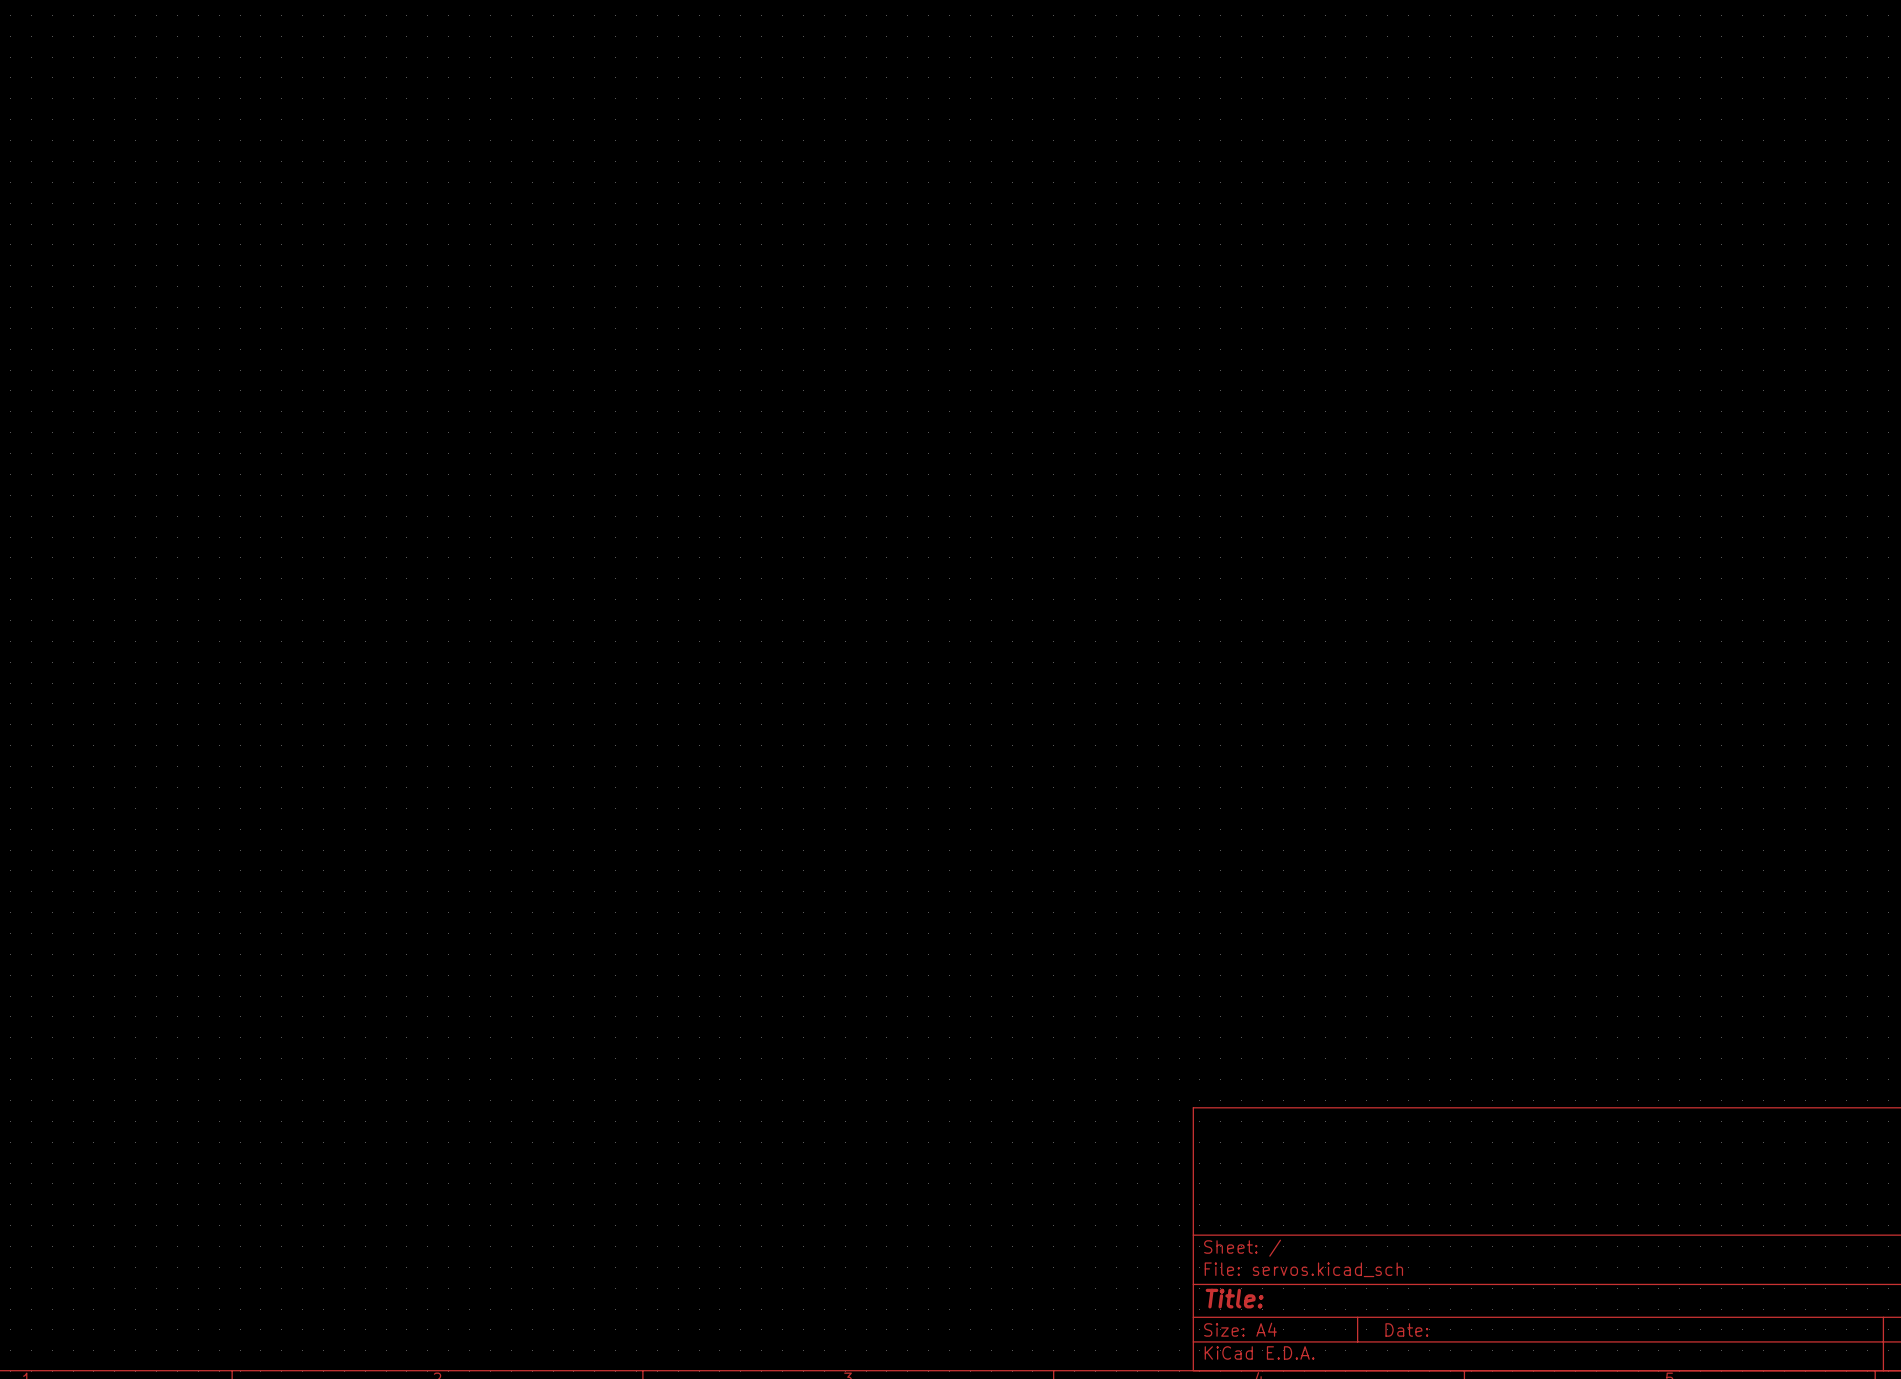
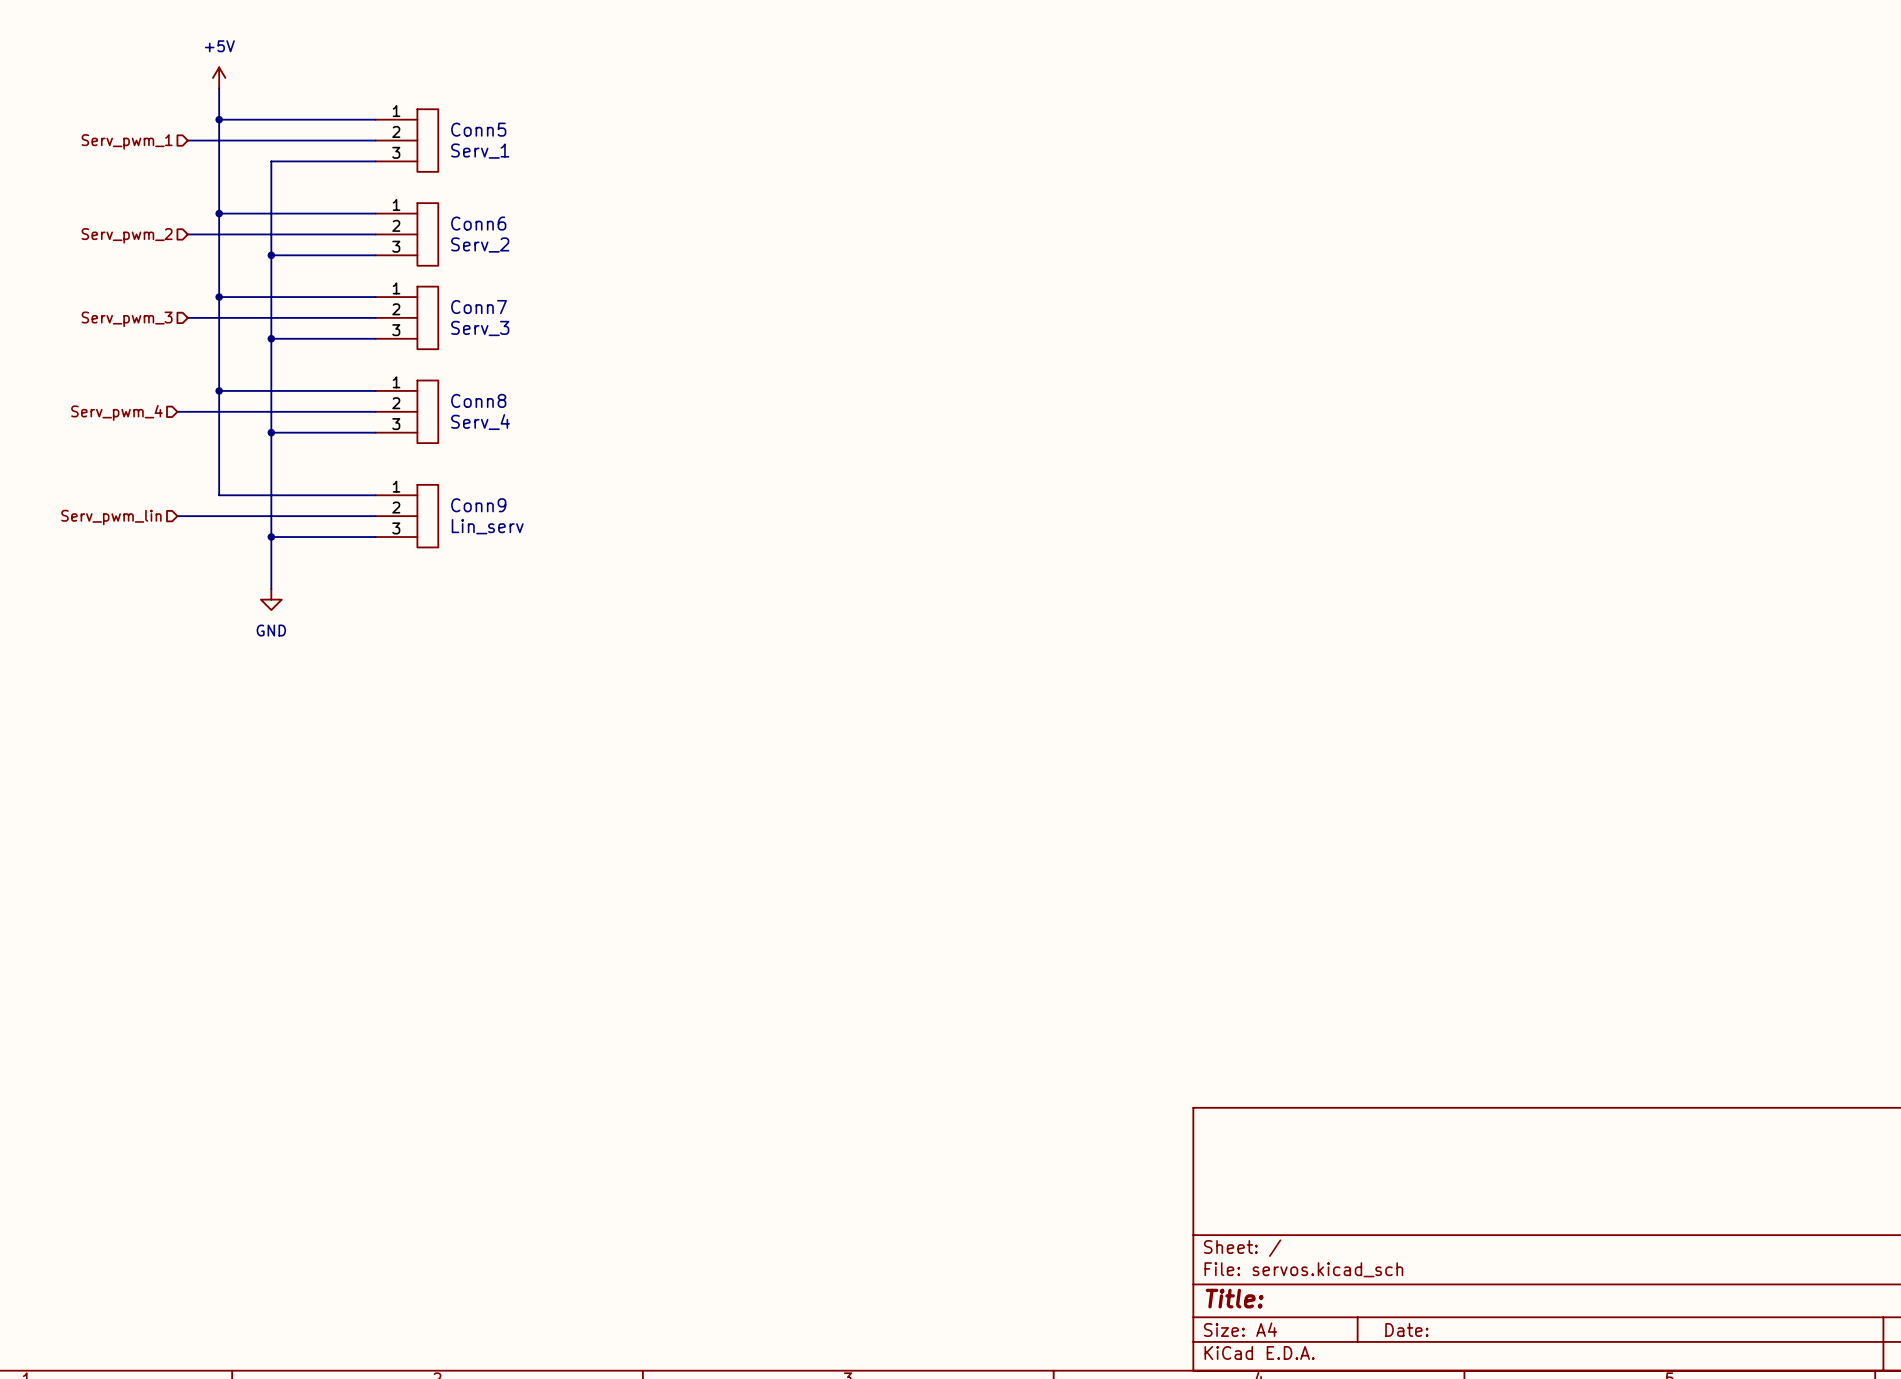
power symbol: none -> +5V (219, 77)
wire: none -> (219, 88) (219, 495) (375, 495)
wire: none -> (219, 119) (375, 119)
junction: none -> (219, 119)
wire: none -> (187, 140) (375, 140)
Conn5: none -> Serv_1 (406, 140)
hierarchical label: none -> Serv_pwm_1 (127, 141)
wire: none -> (375, 161) (271, 161) (271, 589)
wire: none -> (219, 213) (375, 213)
junction: none -> (219, 213)
wire: none -> (187, 234) (375, 234)
Conn6: none -> Serv_2 (406, 234)
hierarchical label: none -> Serv_pwm_2 (127, 235)
wire: none -> (271, 255) (375, 255)
junction: none -> (271, 255)
wire: none -> (219, 297) (375, 297)
junction: none -> (219, 297)
wire: none -> (187, 317) (375, 317)
Conn7: none -> Serv_3 (406, 317)
hierarchical label: none -> Serv_pwm_3 (127, 319)
wire: none -> (271, 338) (375, 338)
junction: none -> (271, 338)
wire: none -> (219, 390) (375, 390)
junction: none -> (219, 390)
wire: none -> (177, 411) (375, 411)
Conn8: none -> Serv_4 (406, 411)
hierarchical label: none -> Serv_pwm_4 (116, 412)
wire: none -> (271, 432) (375, 432)
junction: none -> (271, 432)
wire: none -> (177, 516) (375, 516)
Conn9: none -> Lin_serv (406, 516)
hierarchical label: none -> Serv_pwm_lin (111, 517)
wire: none -> (271, 537) (375, 537)
junction: none -> (271, 537)
power symbol: none -> GND (271, 599)

